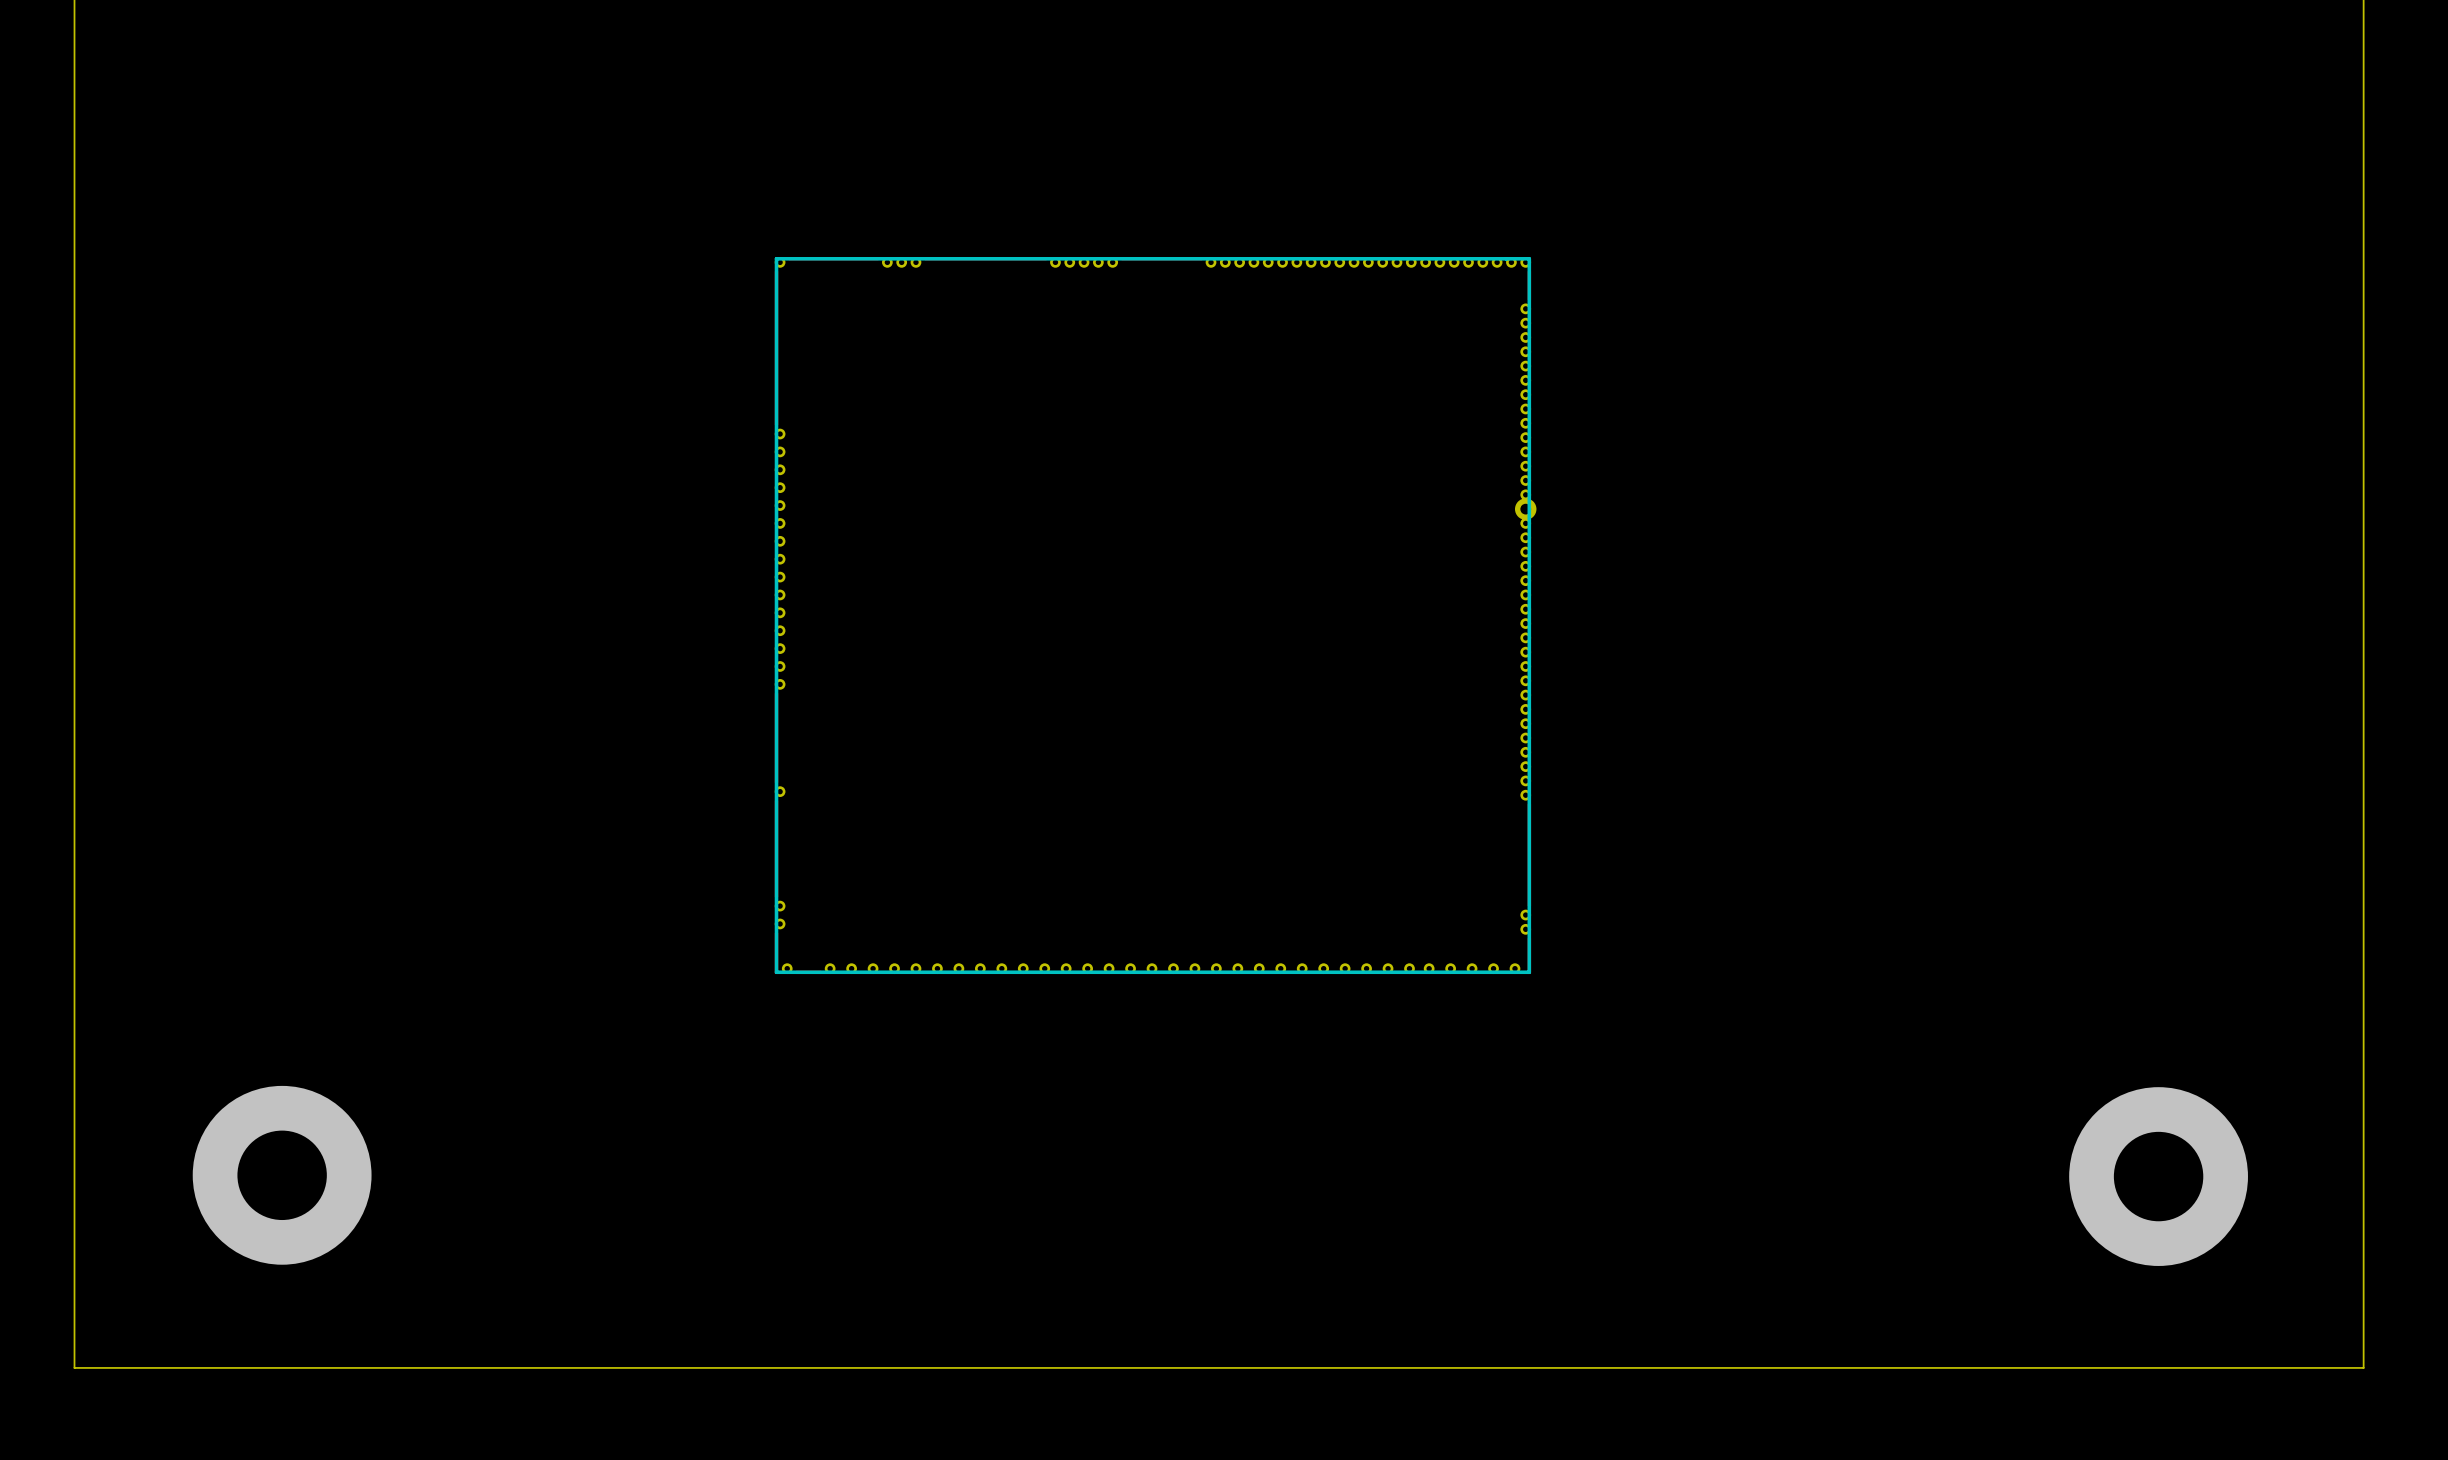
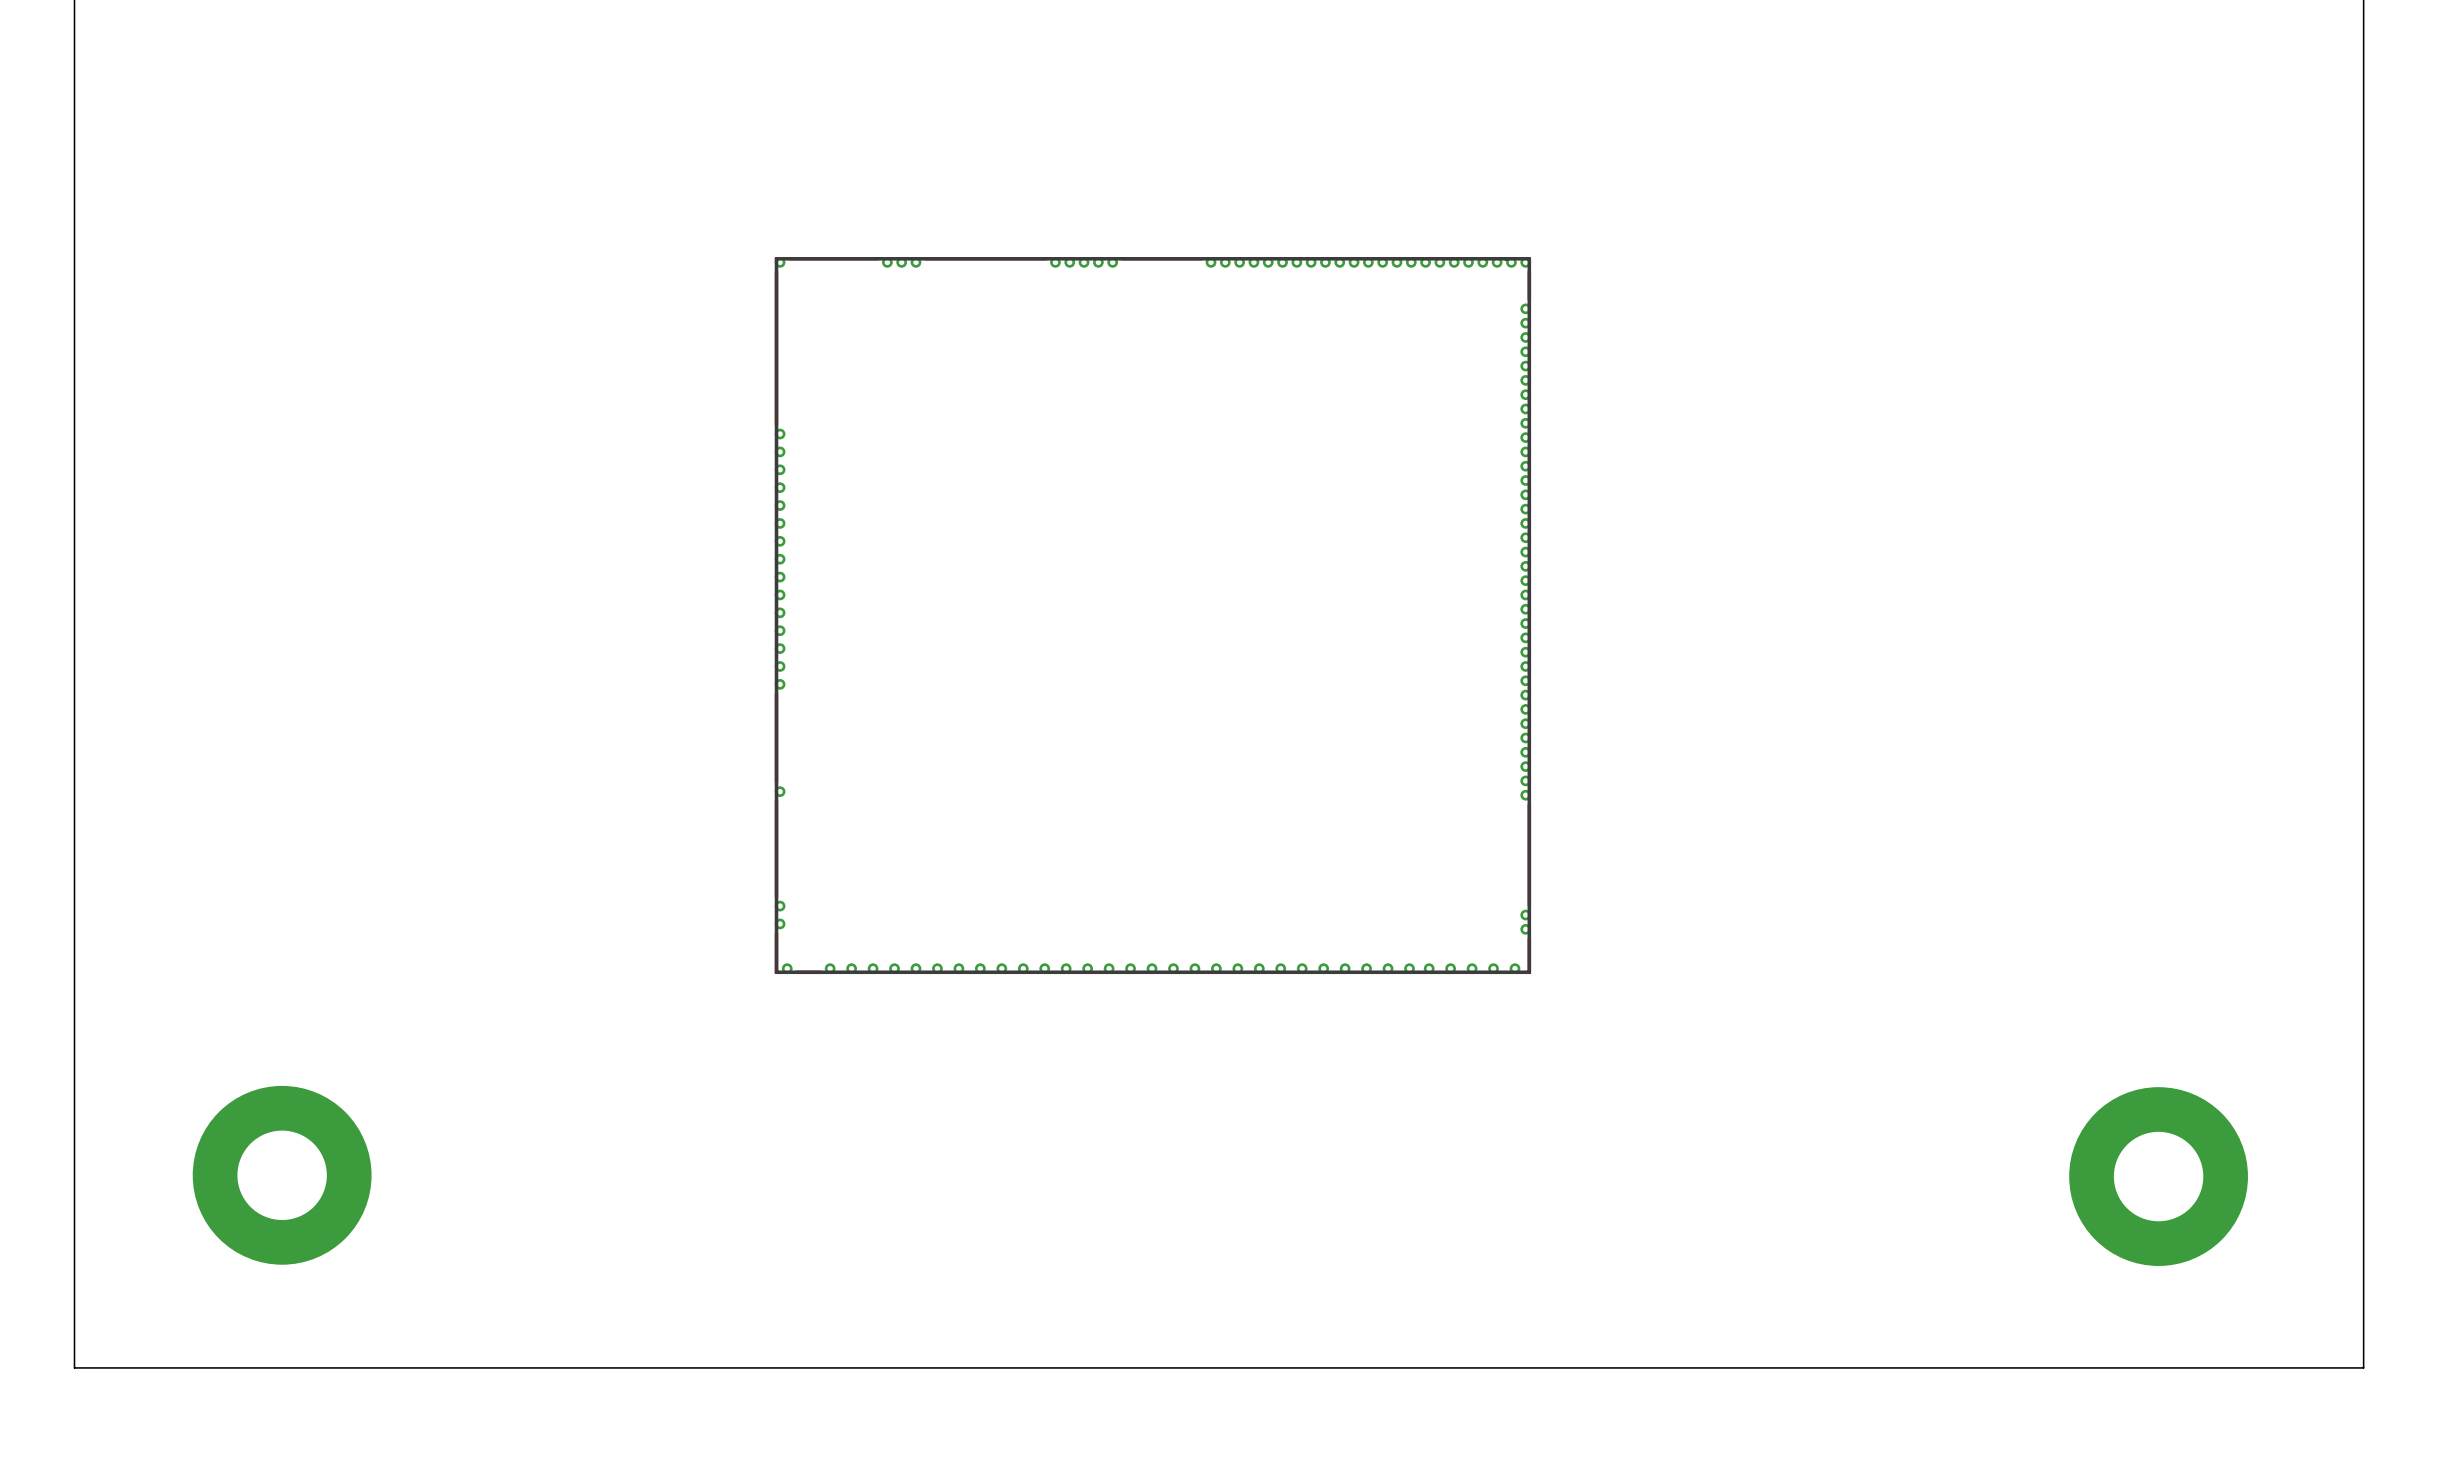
part footprint: [774, 257, 1537, 975] -> [774, 257, 1532, 975]

